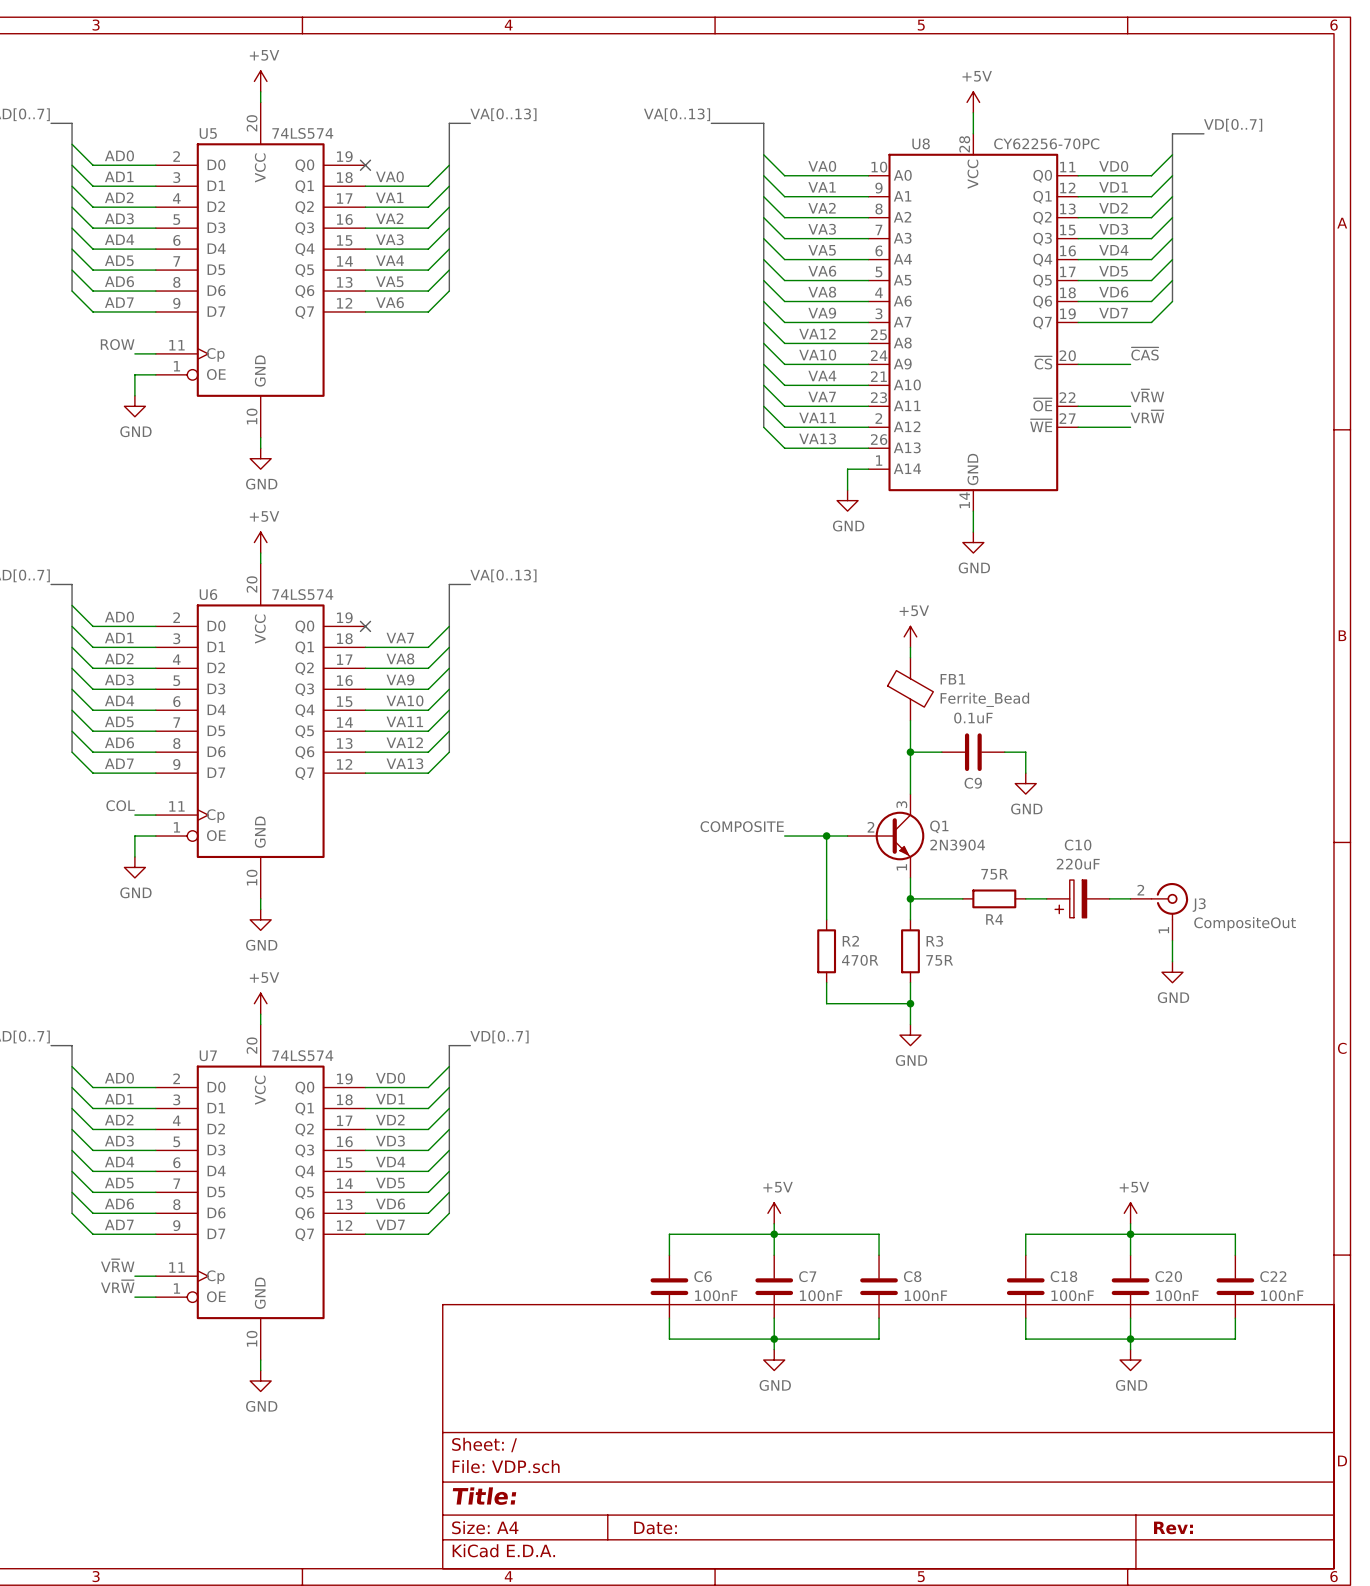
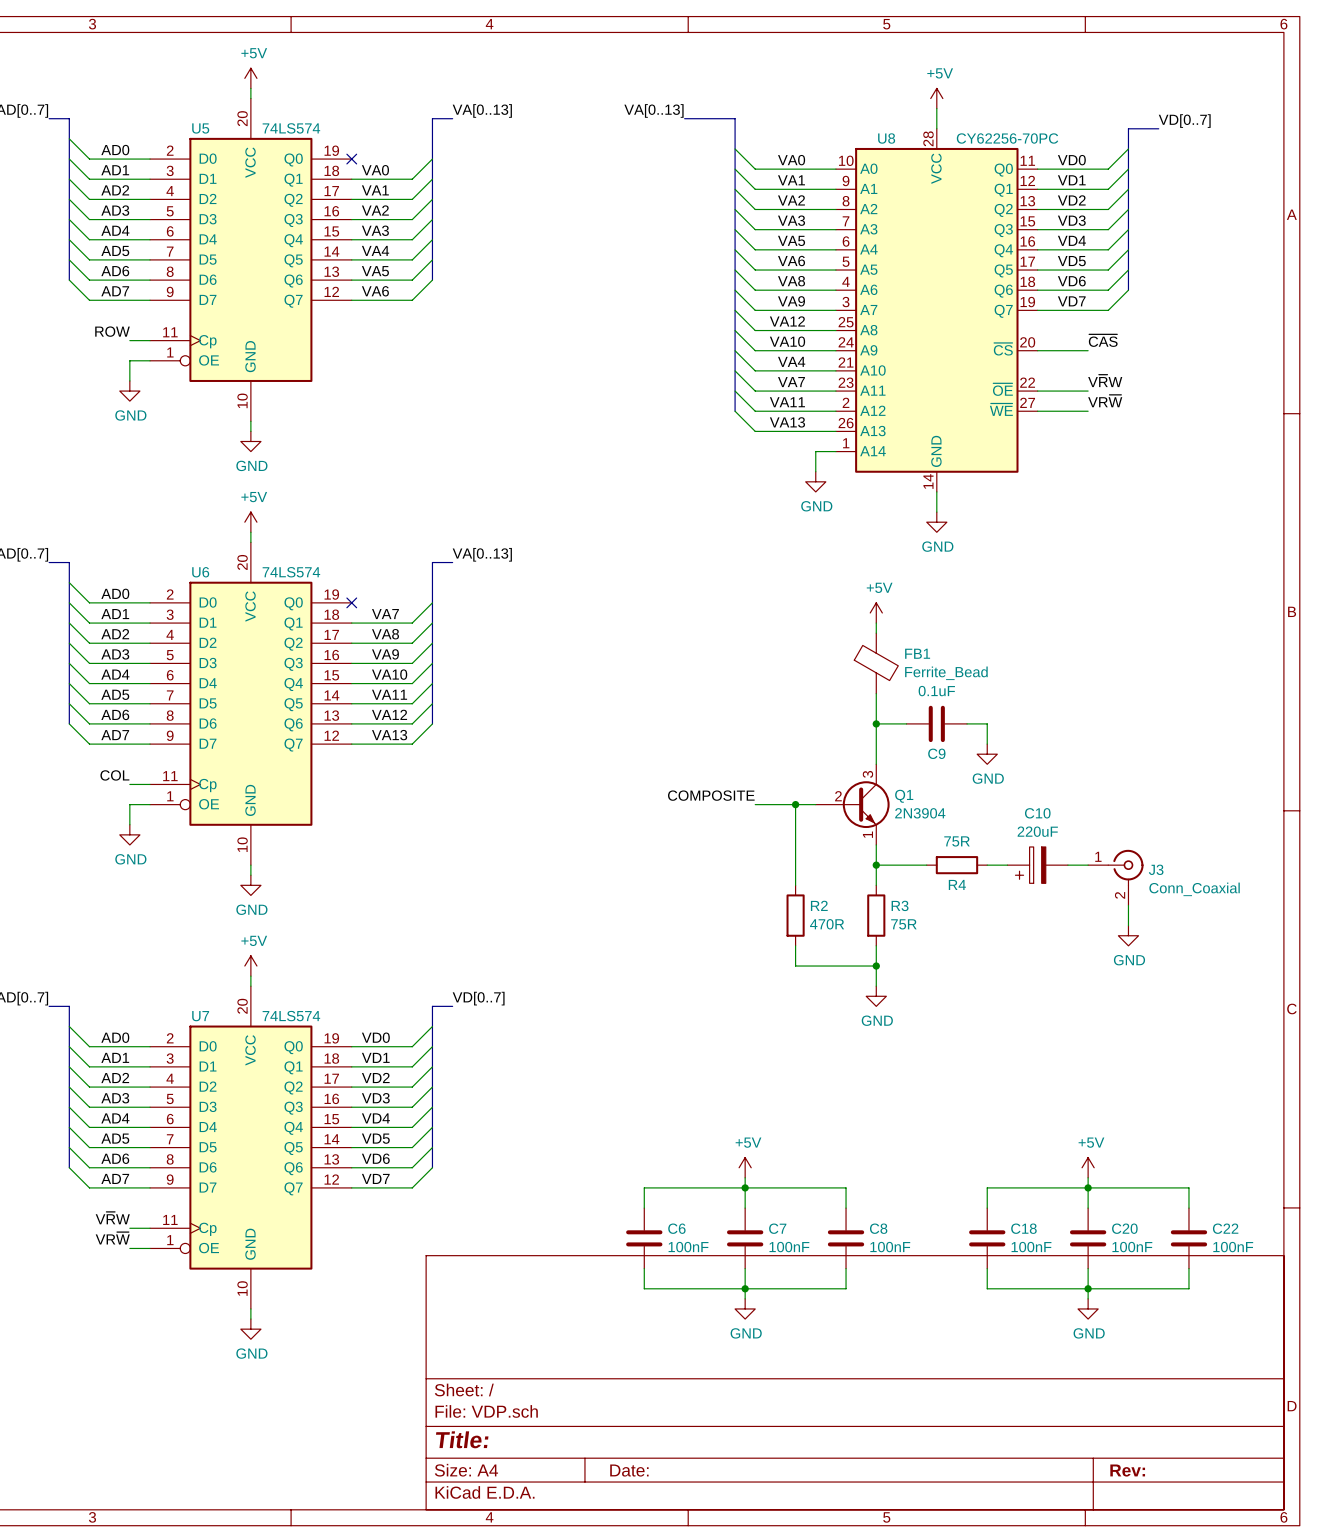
J3 pin number: 2 (1140, 890) -> 1 (1098, 856)
J3 value: CompositeOut (1245, 924) -> Conn_Coaxial (1194, 889)
J3 pin number: 1 (1163, 930) -> 2 (1120, 895)

